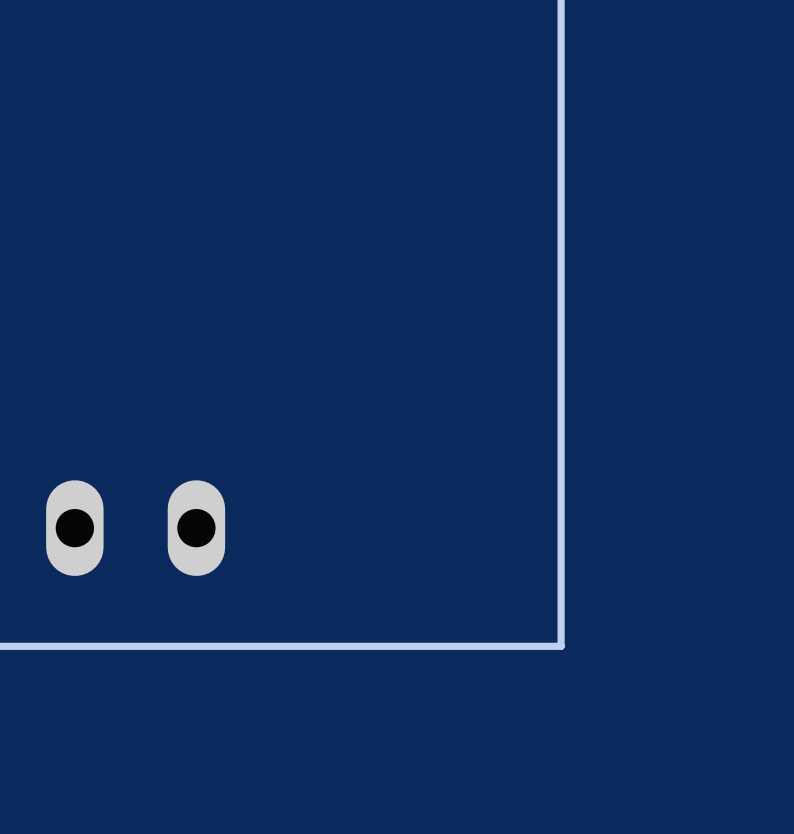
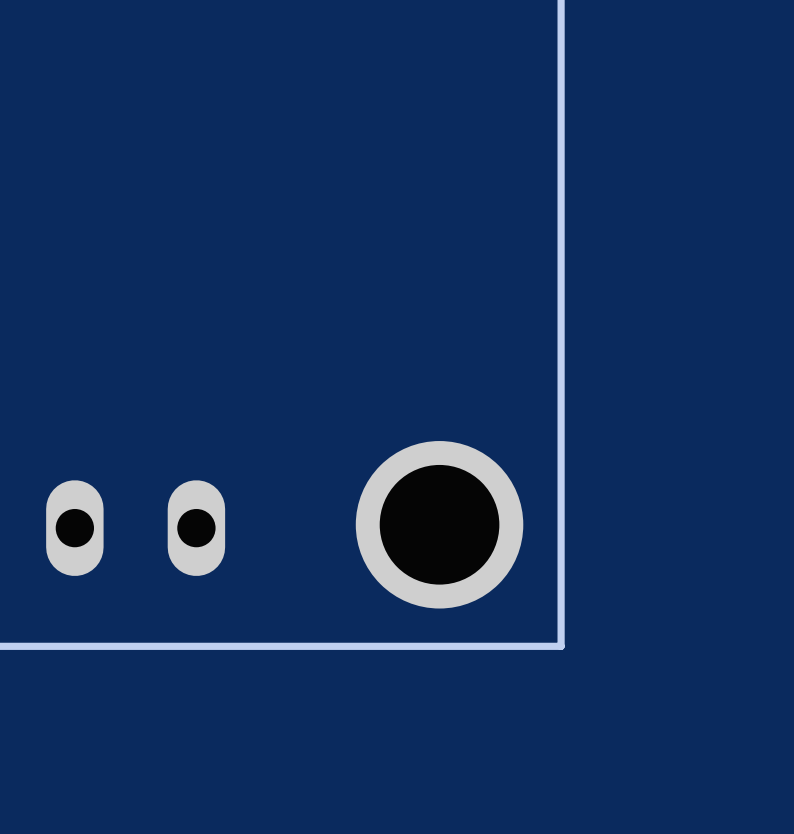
part: none -> (439, 524)

